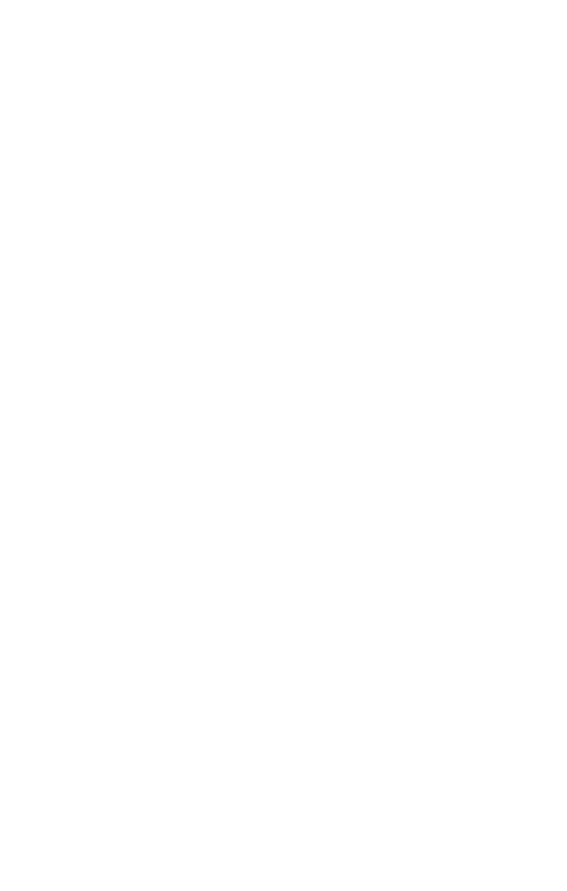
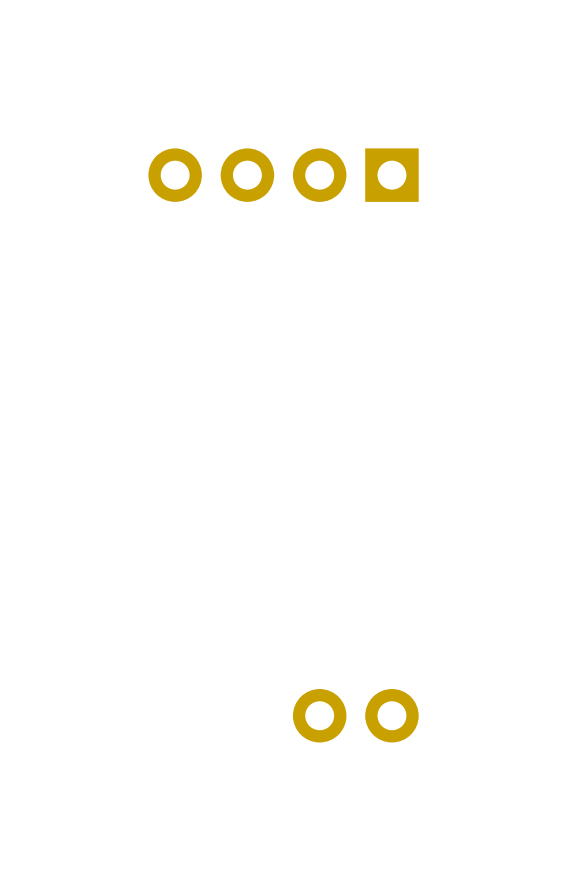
part: none -> (283, 175)
part: none -> (355, 715)

